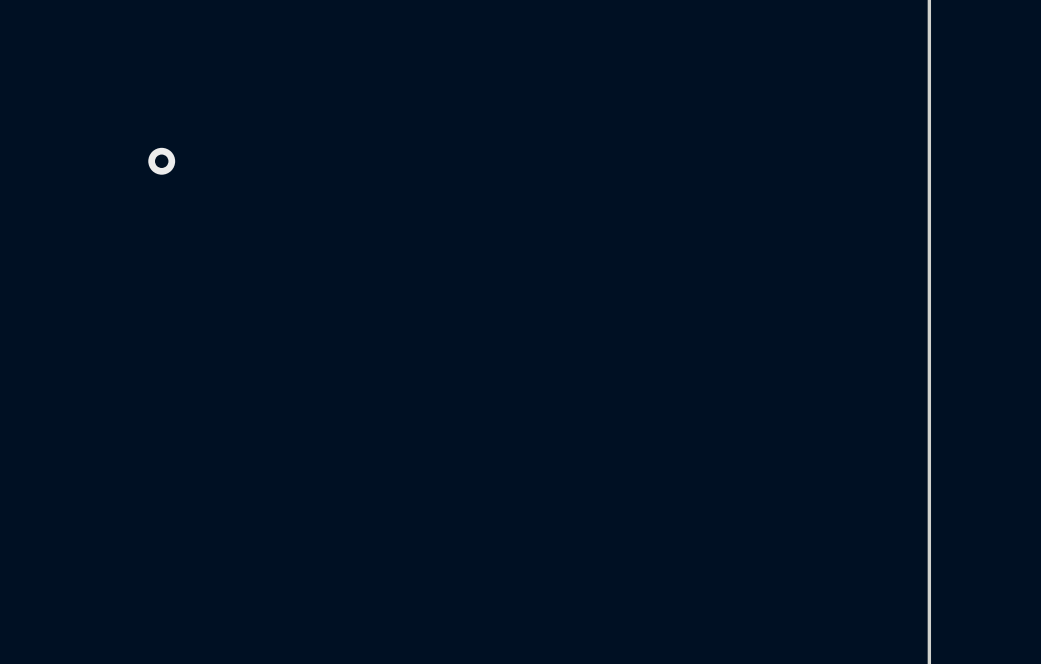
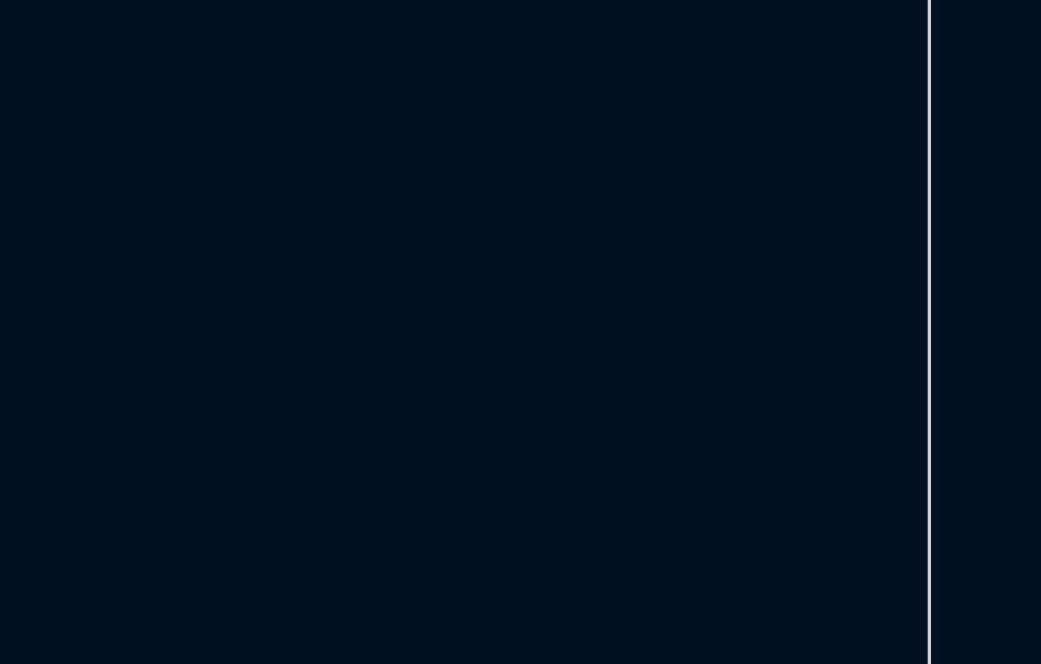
via: (161, 161) -> none

